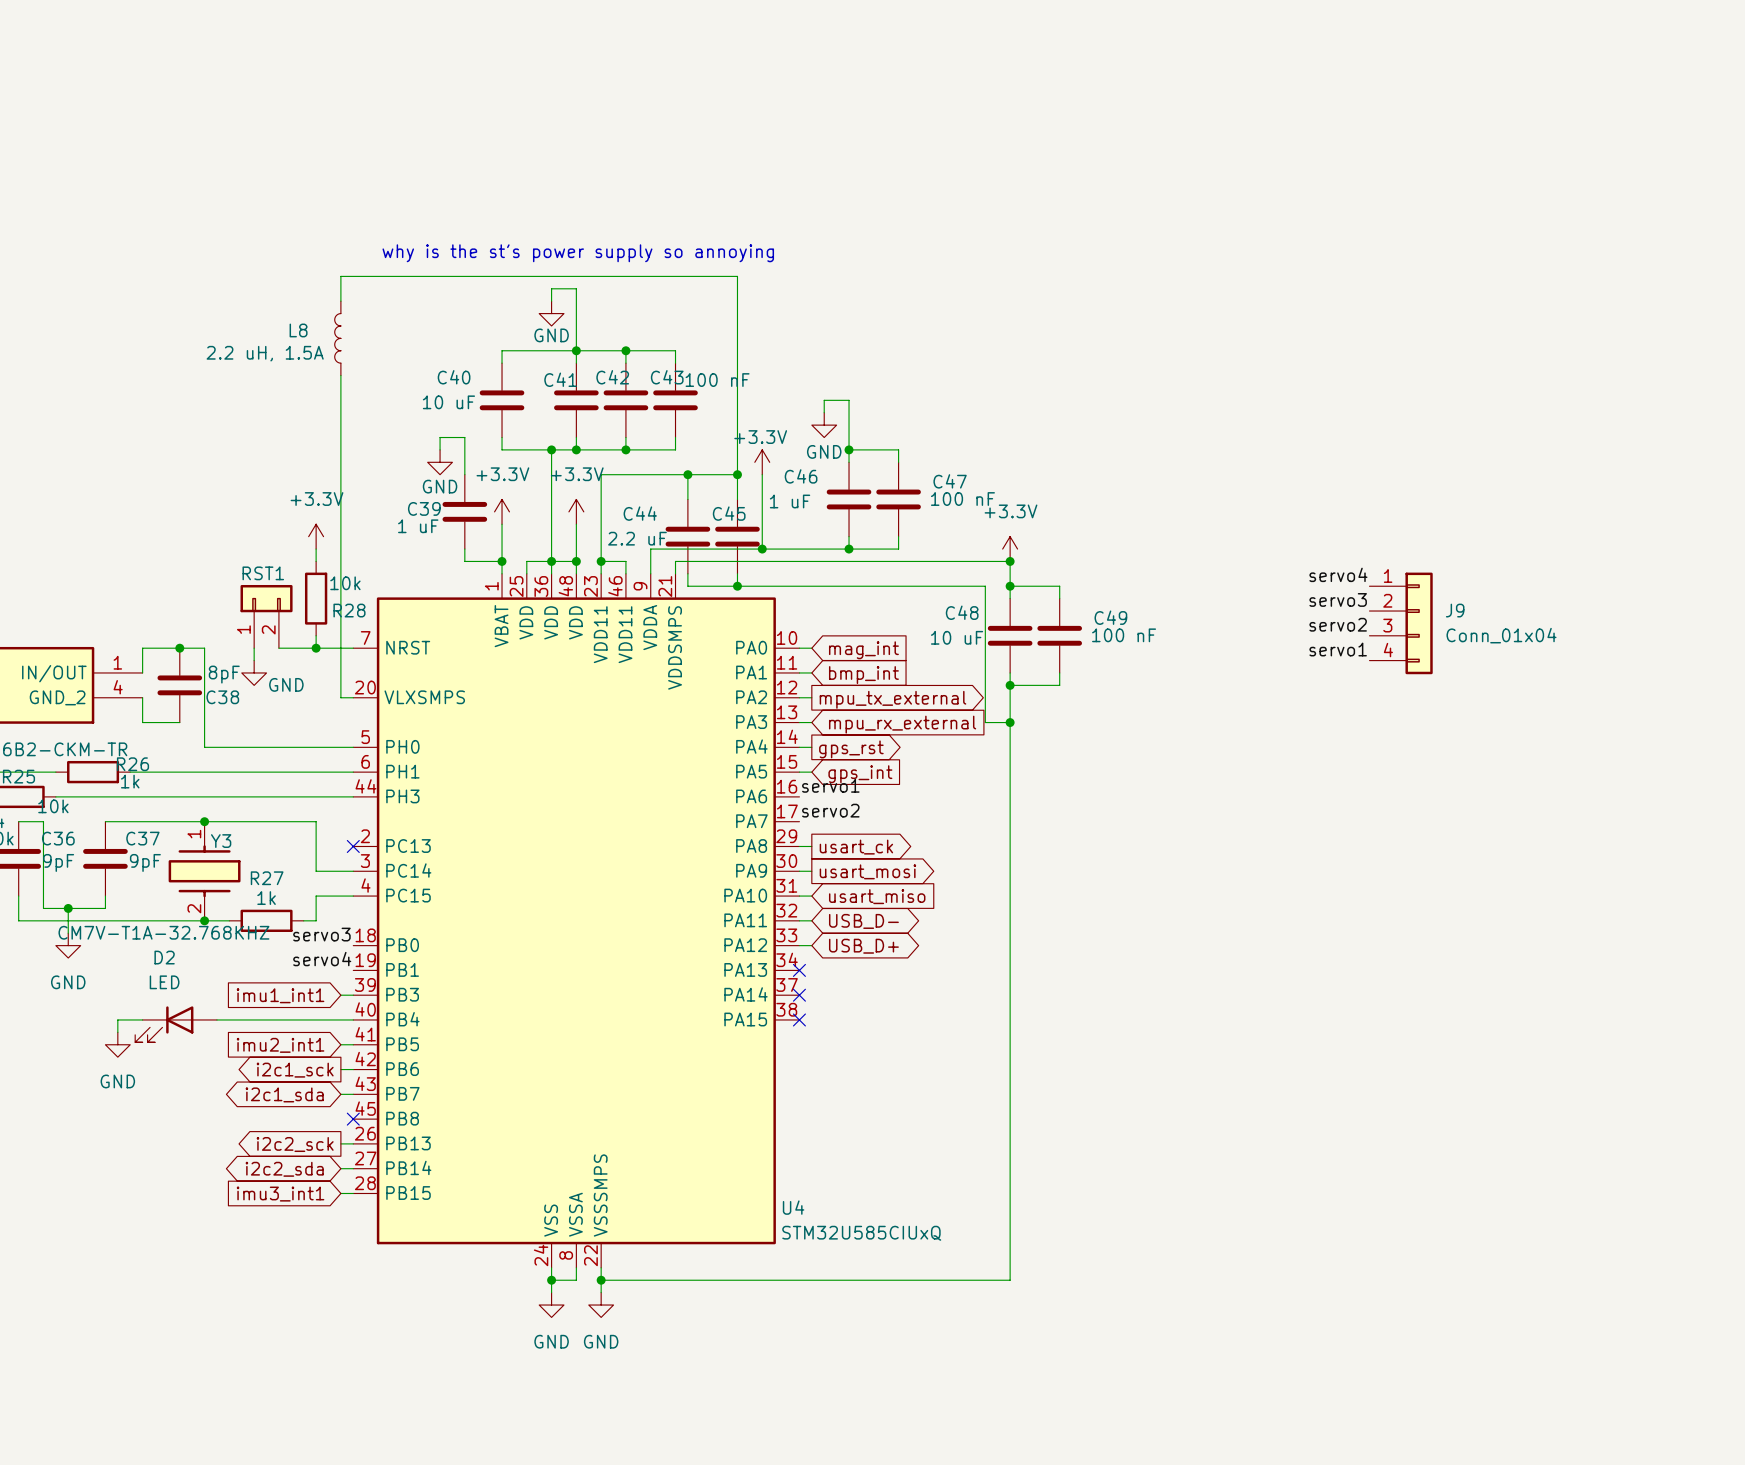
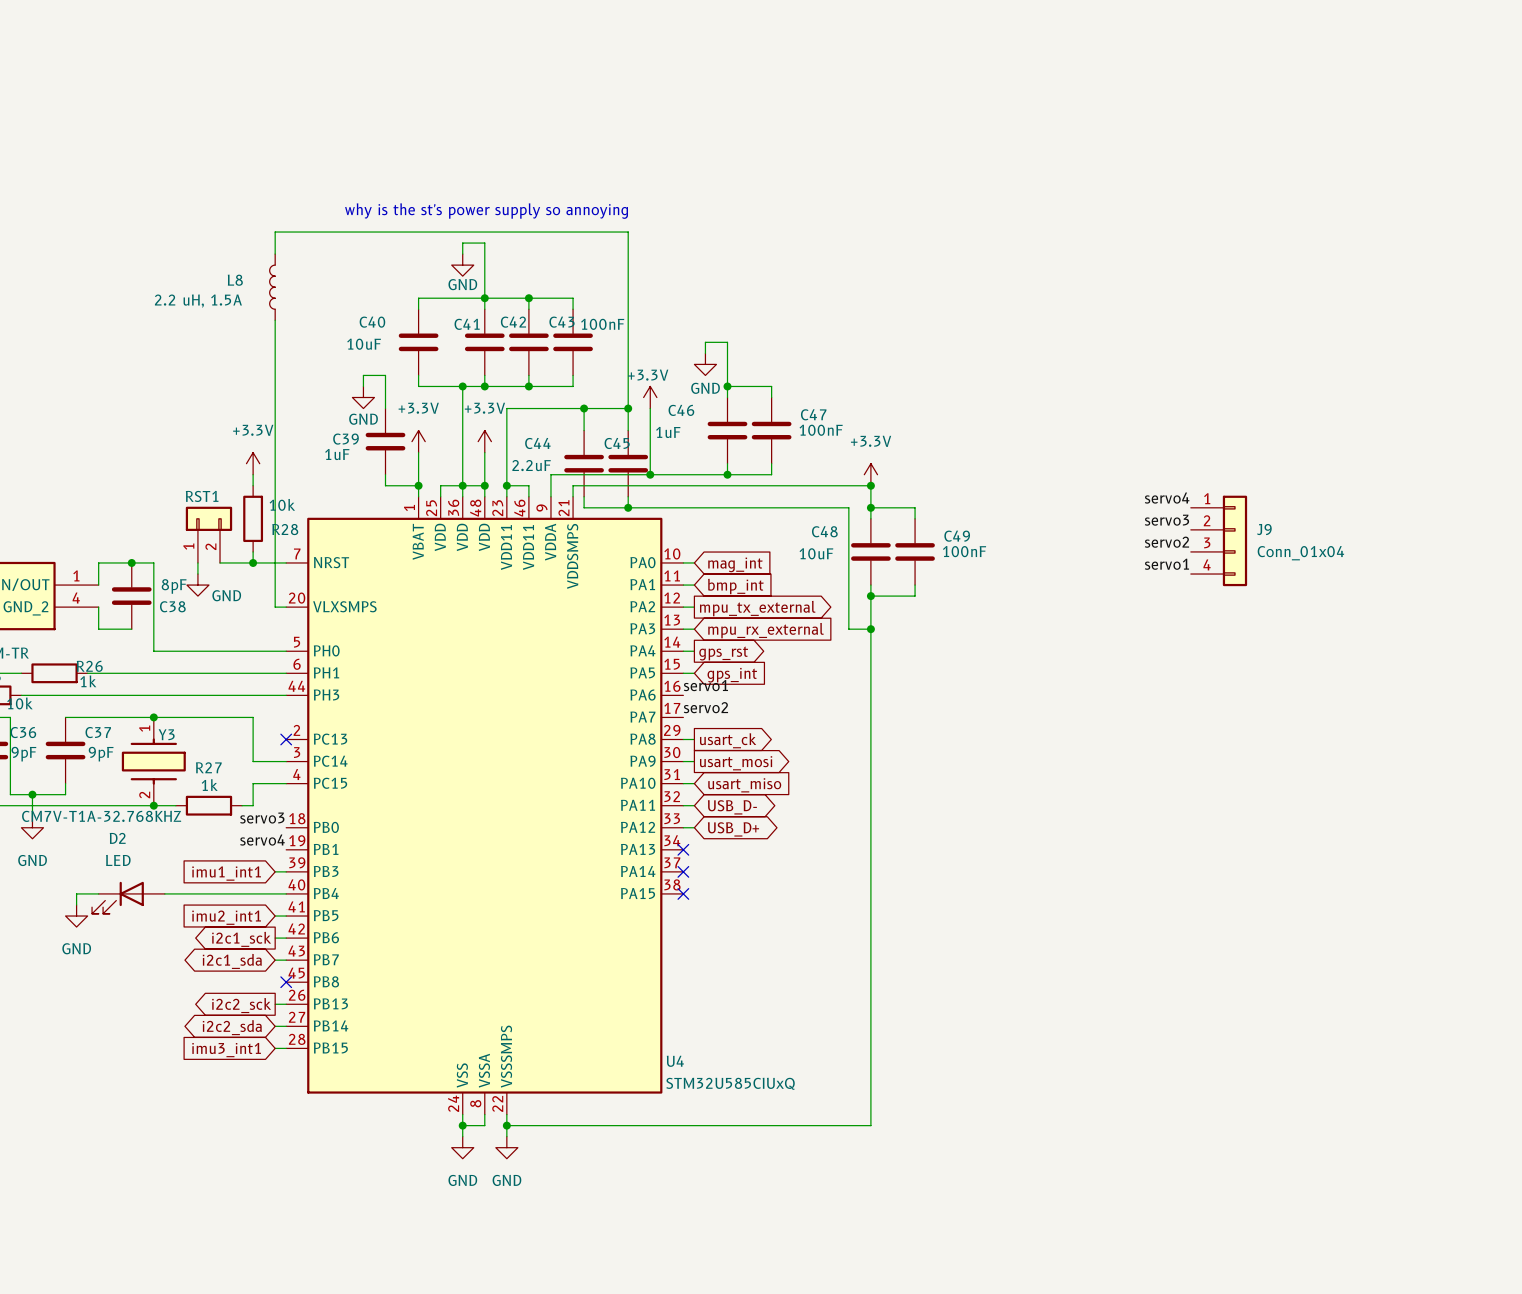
C41 value: 100 nF (717, 380) -> 100nF (602, 324)
C40 value: 10 uF (448, 402) -> 10uF (364, 344)
C47 value: 100 nF (962, 499) -> 100nF (821, 430)
C46 value: 1 uF (790, 501) -> 1uF (668, 432)
C39 value: 1 uF (418, 526) -> 1uF (337, 454)
C44 value: 2.2 uF (637, 538) -> 2.2uF (531, 465)
C49 value: 100 nF (1124, 635) -> 100nF (964, 551)
C48 value: 10 uF (957, 637) -> 10uF (816, 553)

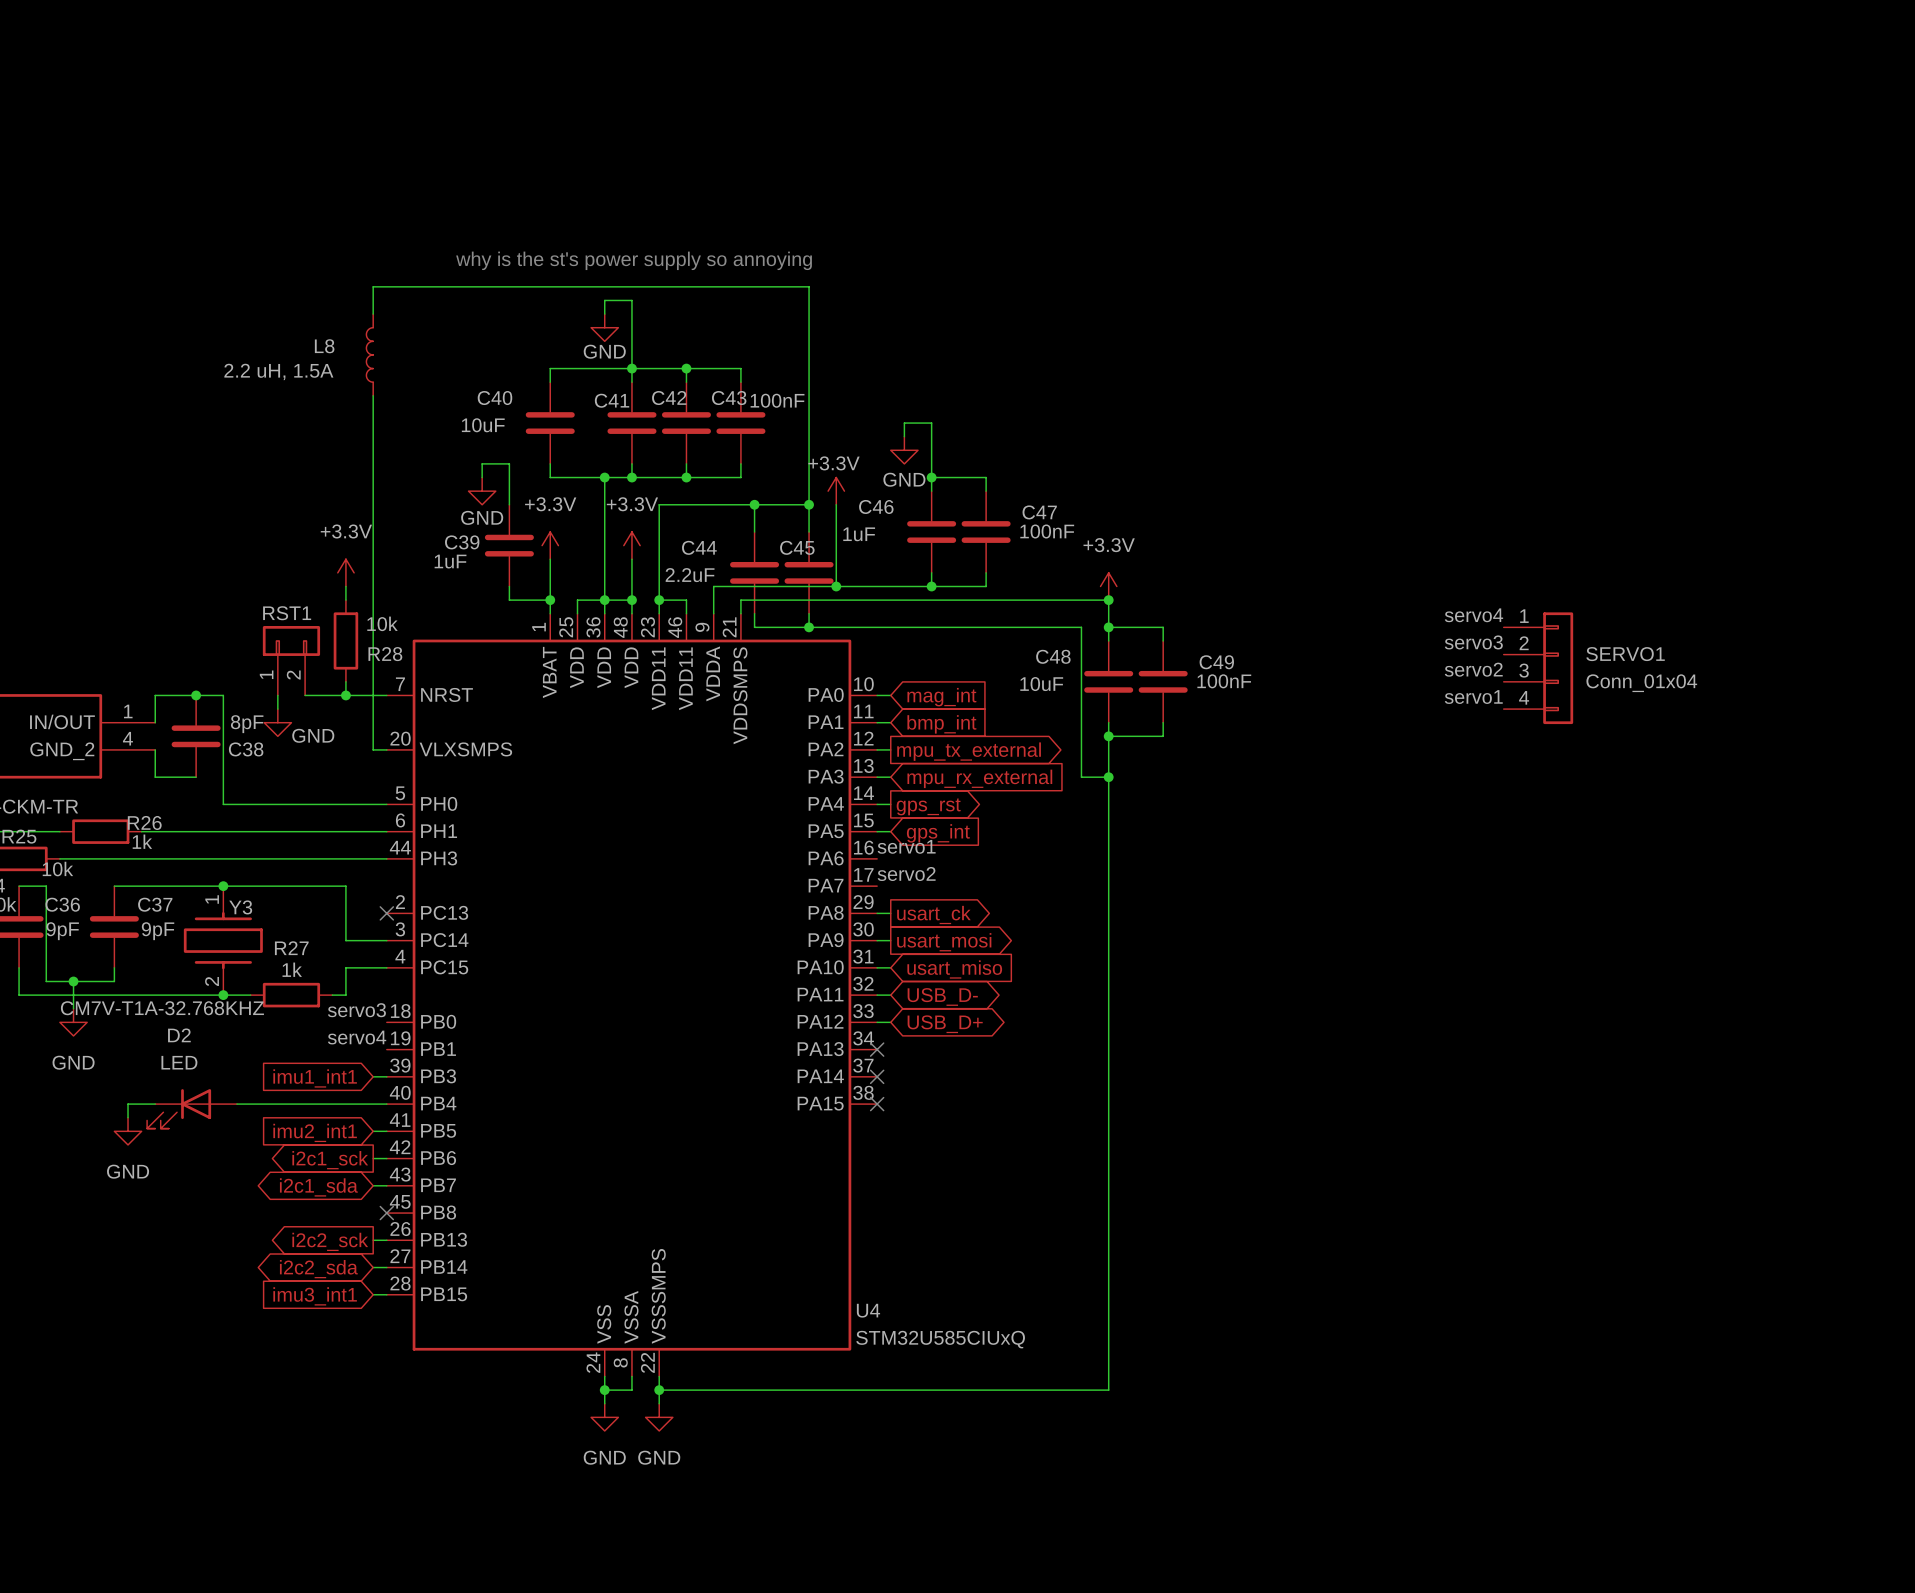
J9 name: J9 (1264, 529) -> SERVO1 (1625, 654)

